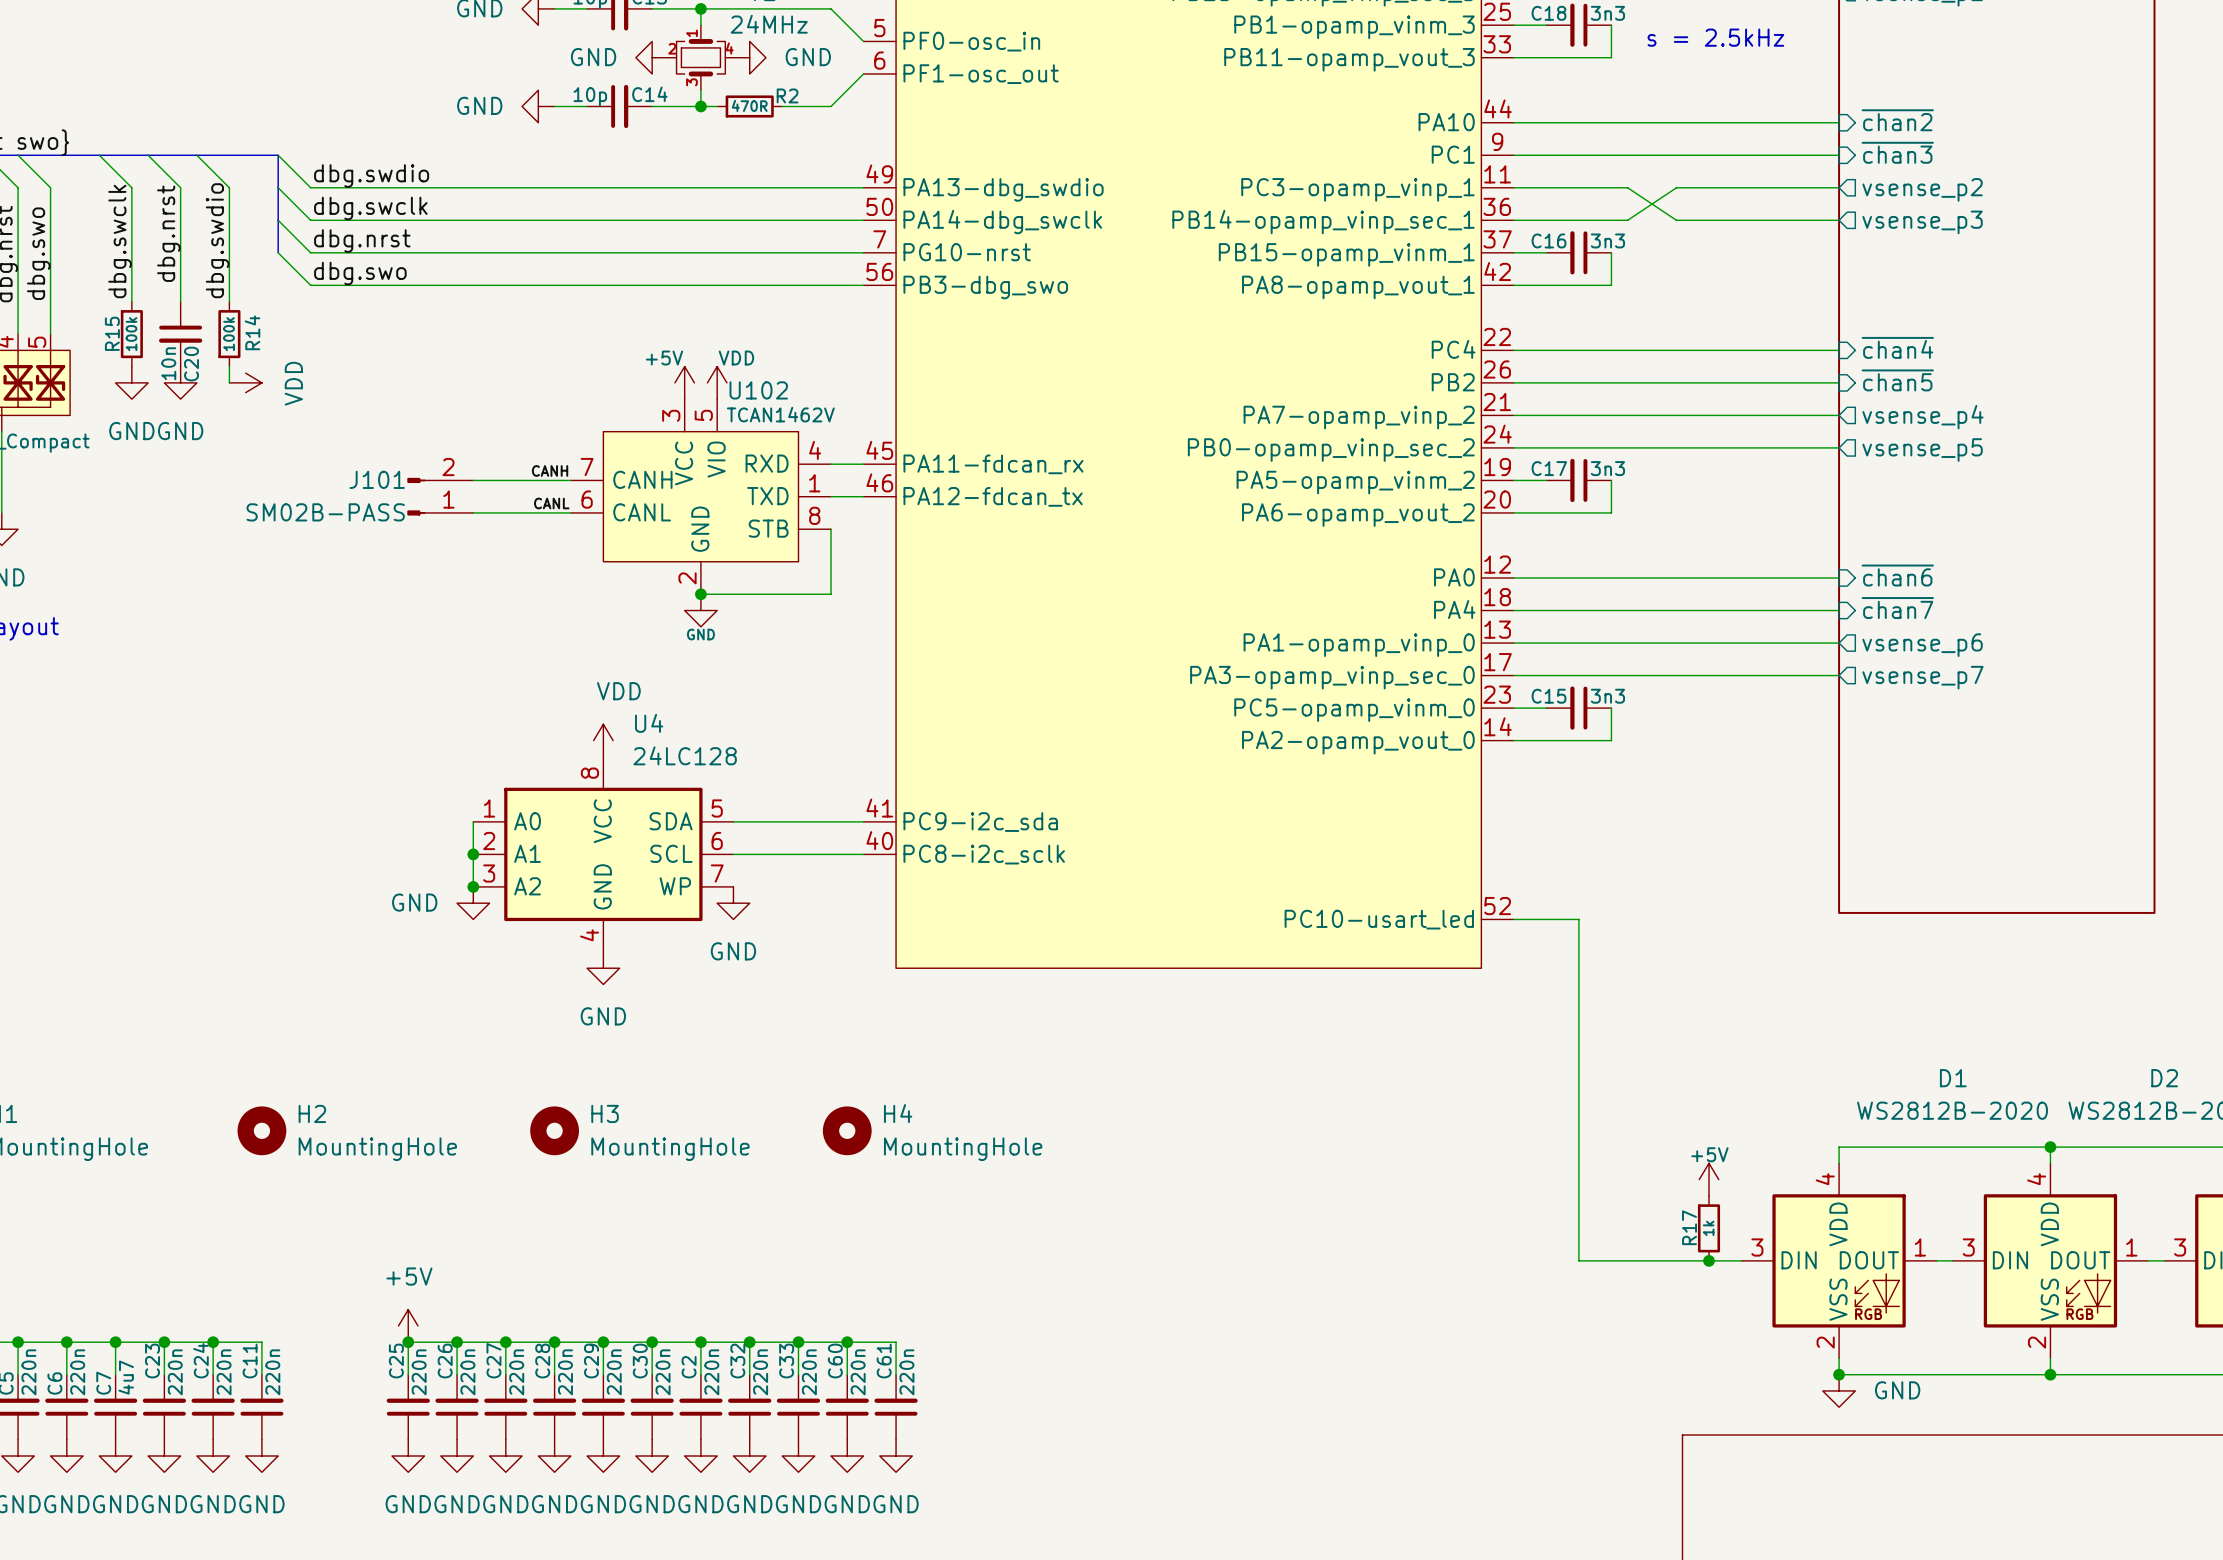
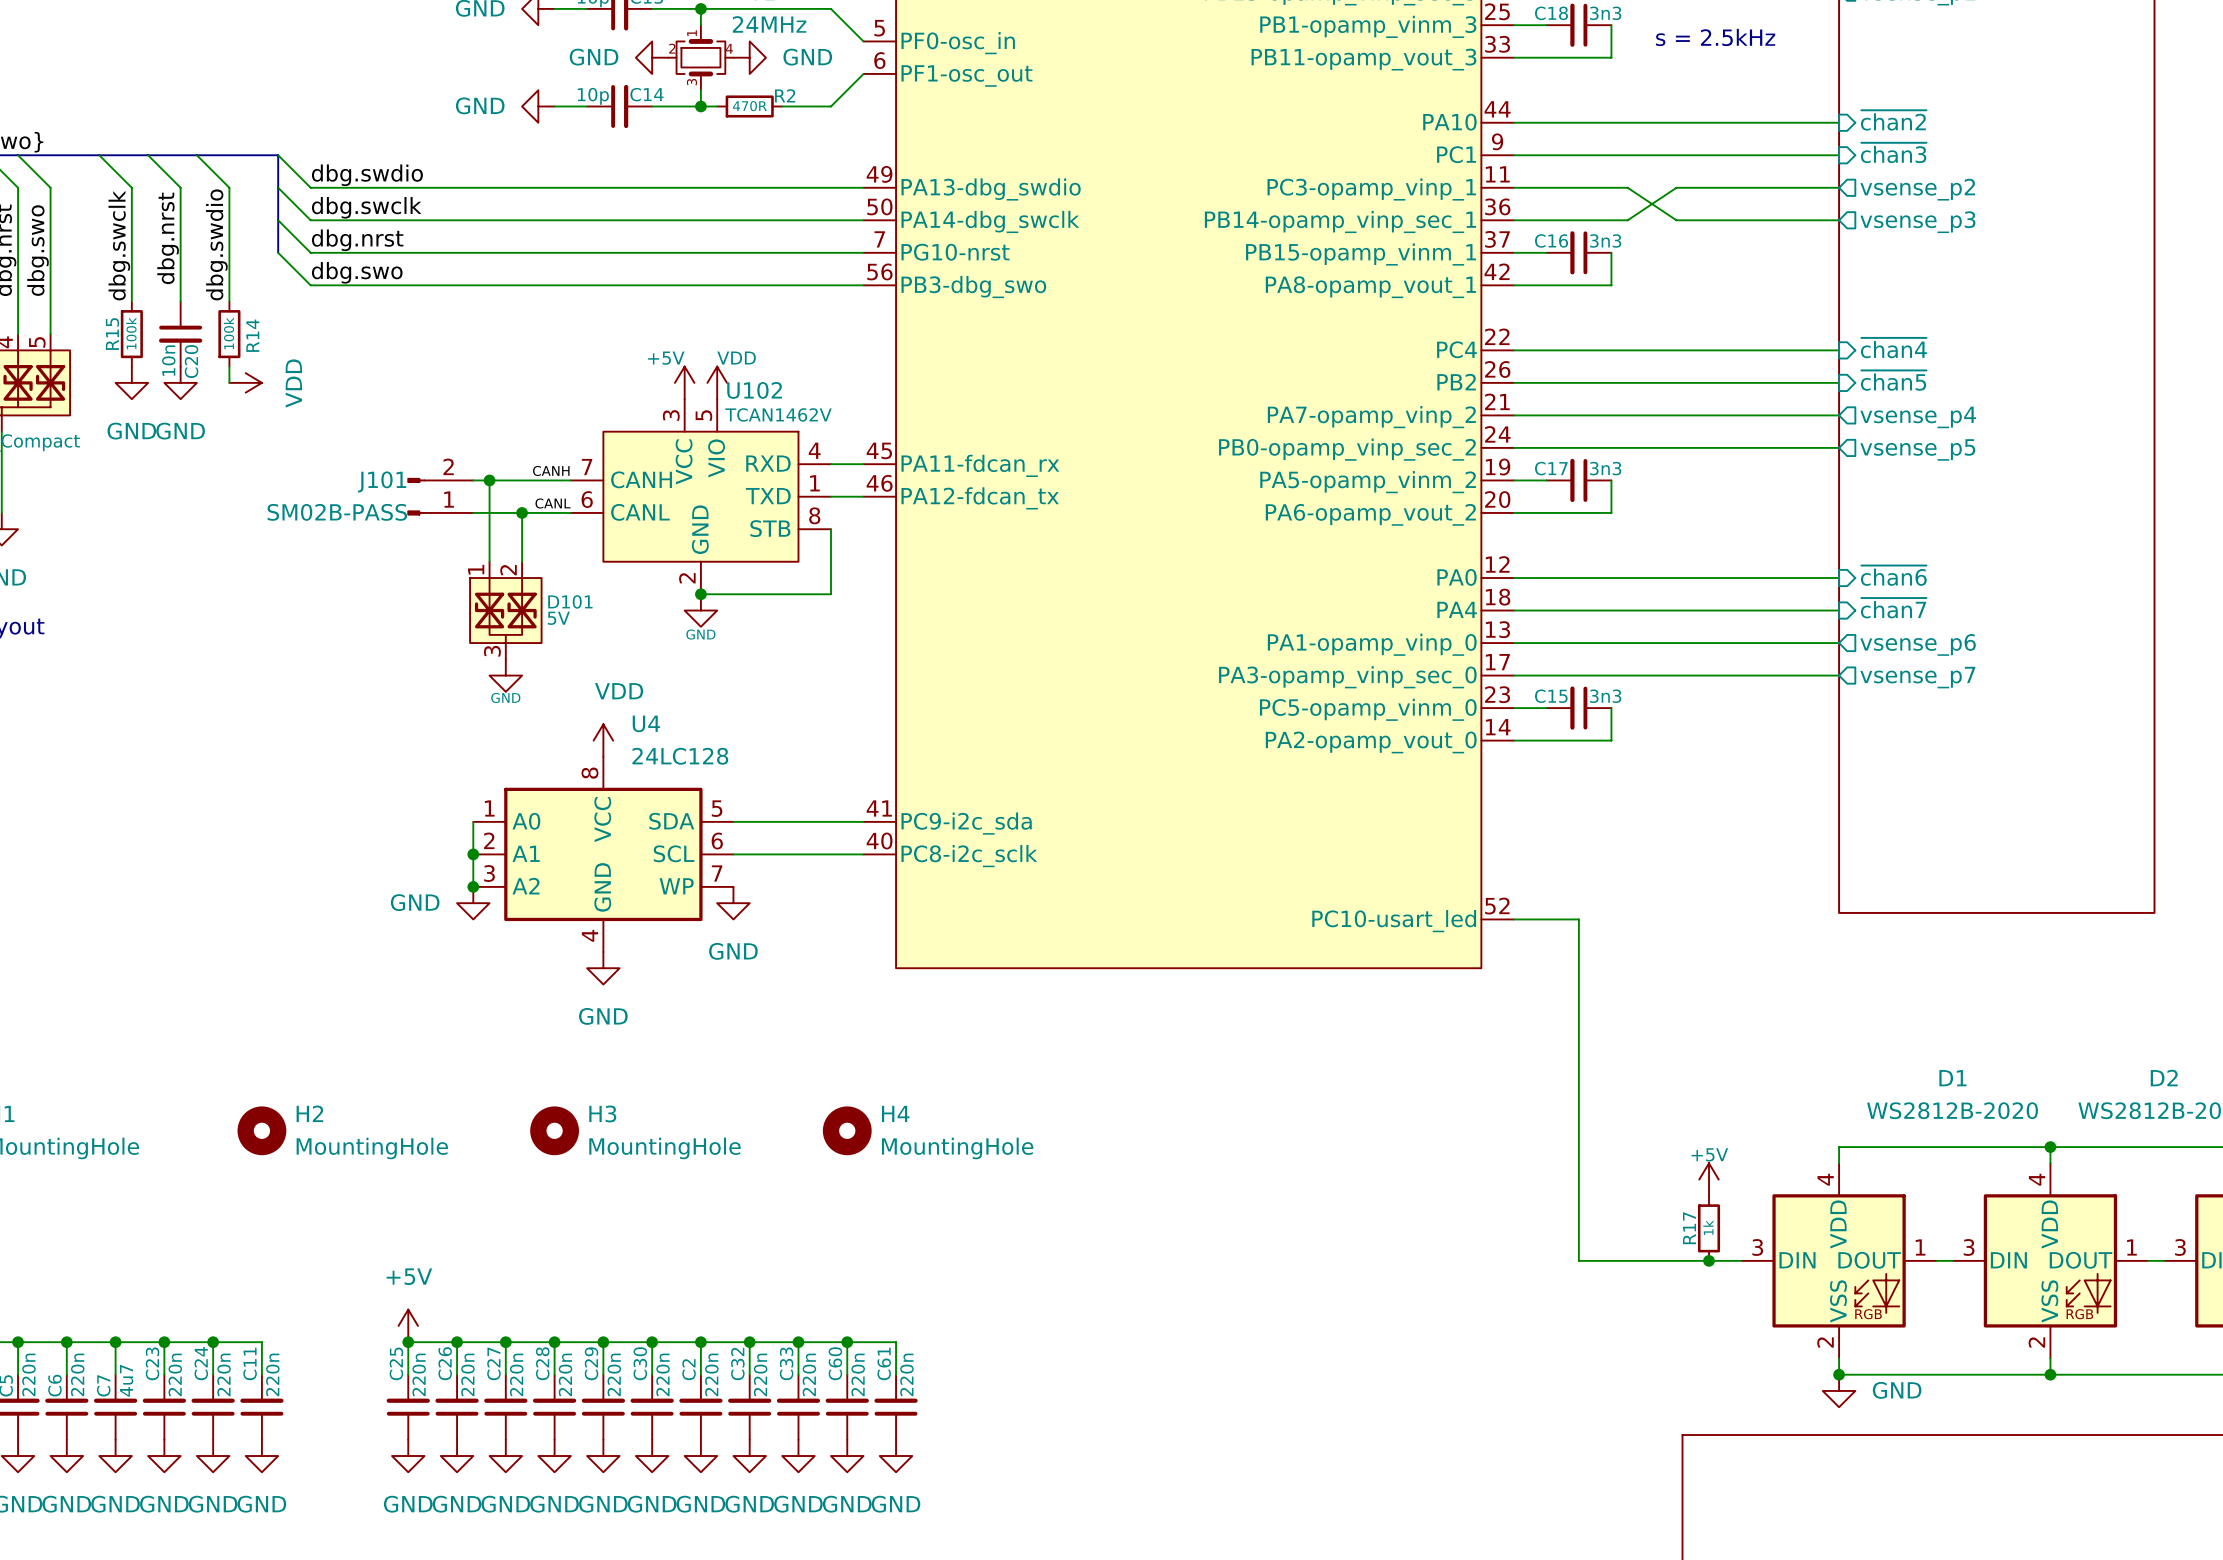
wire: none -> (489, 480) (489, 561)
junction: none -> (489, 480)
wire: none -> (522, 512) (522, 561)
junction: none -> (522, 512)
D101: none -> 5V (505, 610)
power symbol: none -> GND (505, 675)

